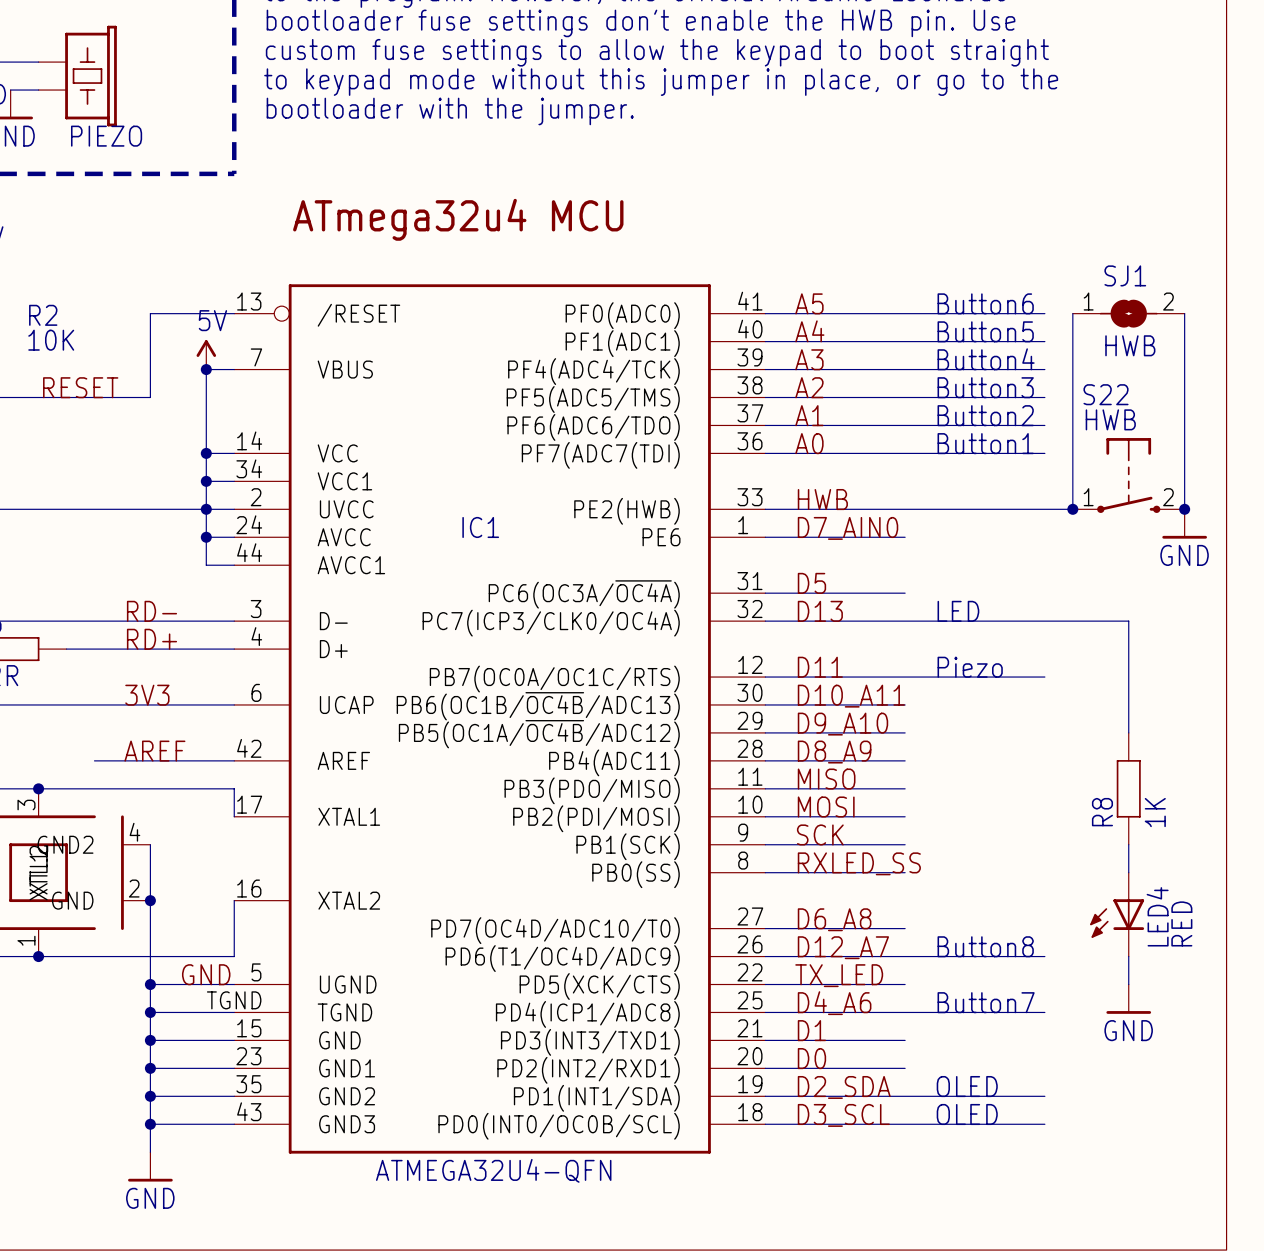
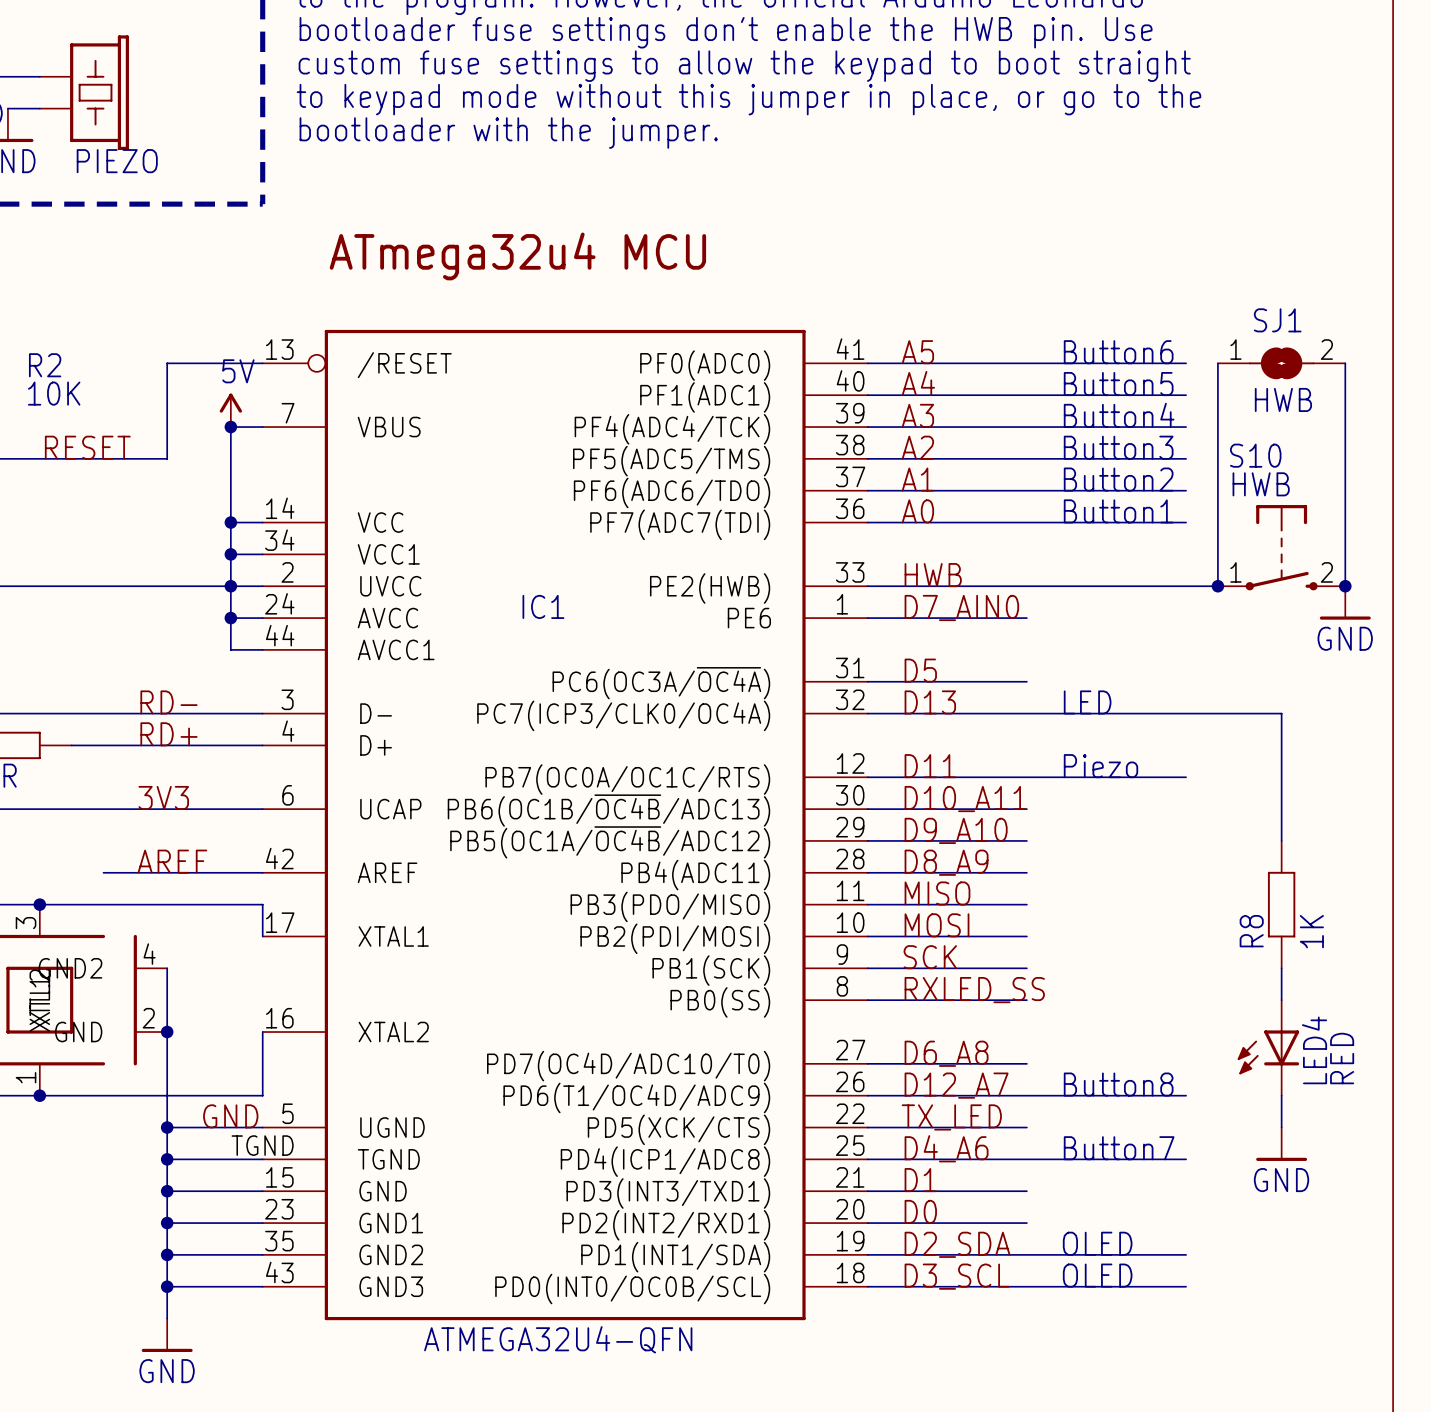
S22 name: S22 (1106, 394) -> S10 (1255, 455)

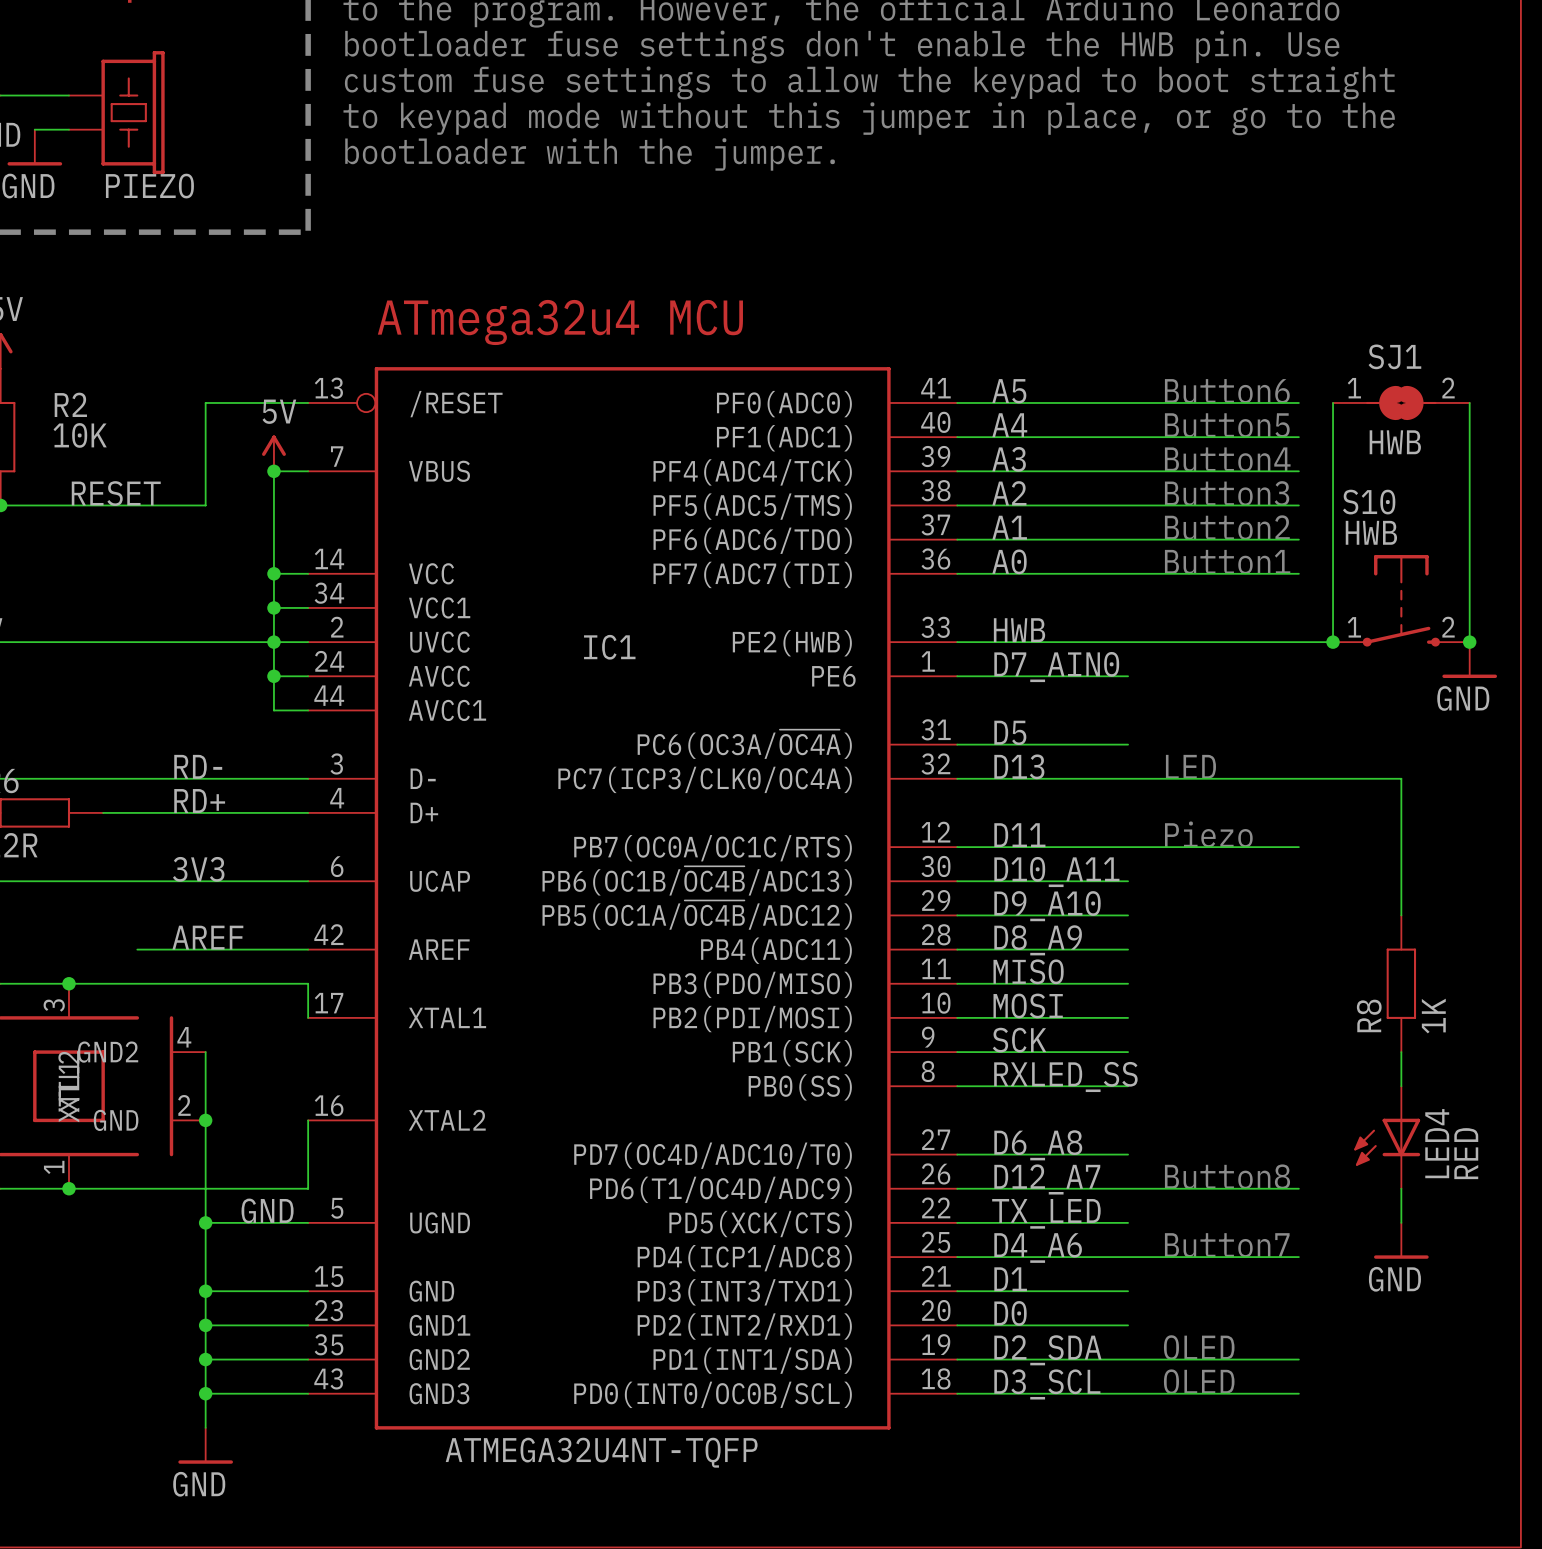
text position: ATmega32u4 MCU (517, 256) -> ATmega32u4 MCU (560, 322)
IC1 symbol: [262, 329, 868, 1321] -> [308, 367, 958, 1430]
wire: (167, 1159) (262, 1159) -> none
junction: (167, 1159) -> none
IC1 value: ATMEGA32U4-QFN (558, 1339) -> ATMEGA32U4NT-TQFP (601, 1452)

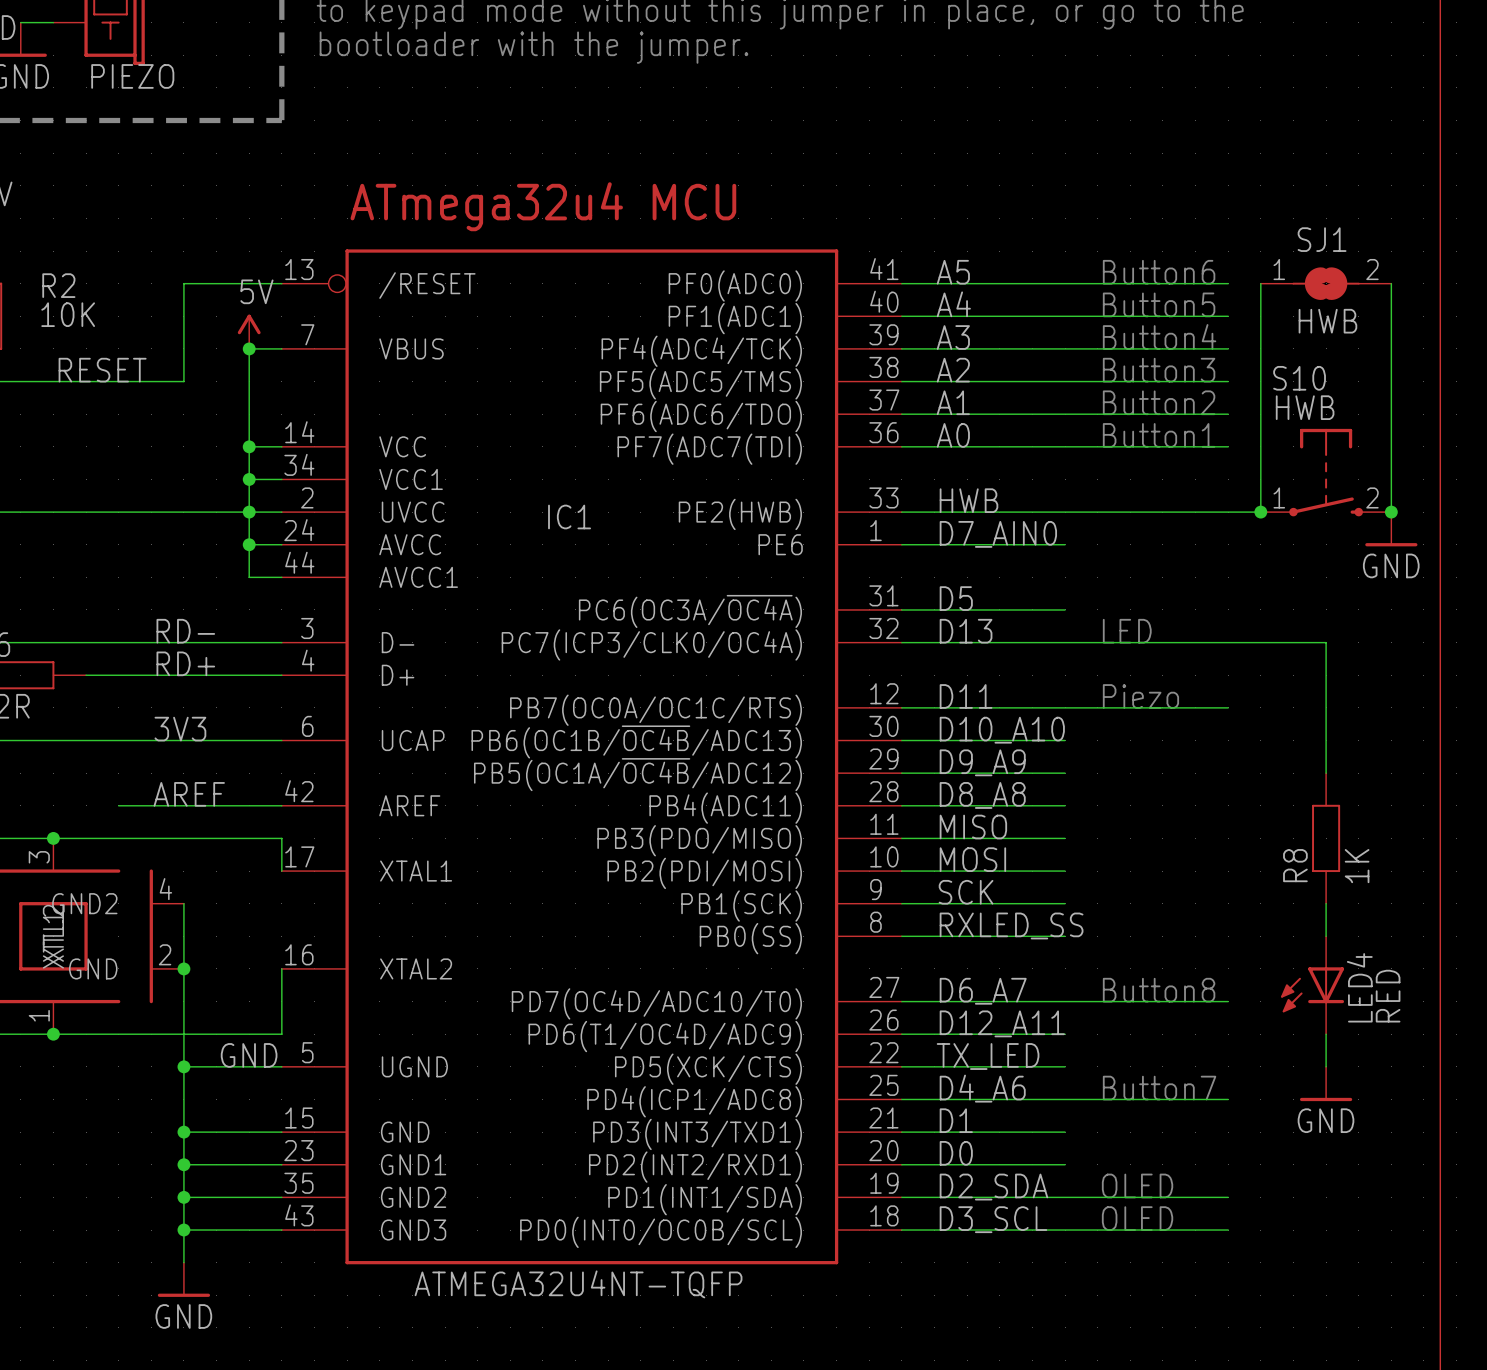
label: D10_A11 (1056, 872) -> D10_A10 (1002, 730)
label: D9_A10 (1047, 906) -> D9_A9 (982, 762)
label: D8_A9 (1038, 940) -> D8_A8 (982, 795)
label: D6_A8 (1038, 1145) -> D6_A7 (983, 991)
text position: Button8 (1227, 1176) -> Button8 (1159, 990)
label: D12_A7 (1047, 1179) -> D12_A11 (1002, 1023)
wire: (1128, 1188) (1298, 1188) -> (1065, 1001) (1228, 1001)

